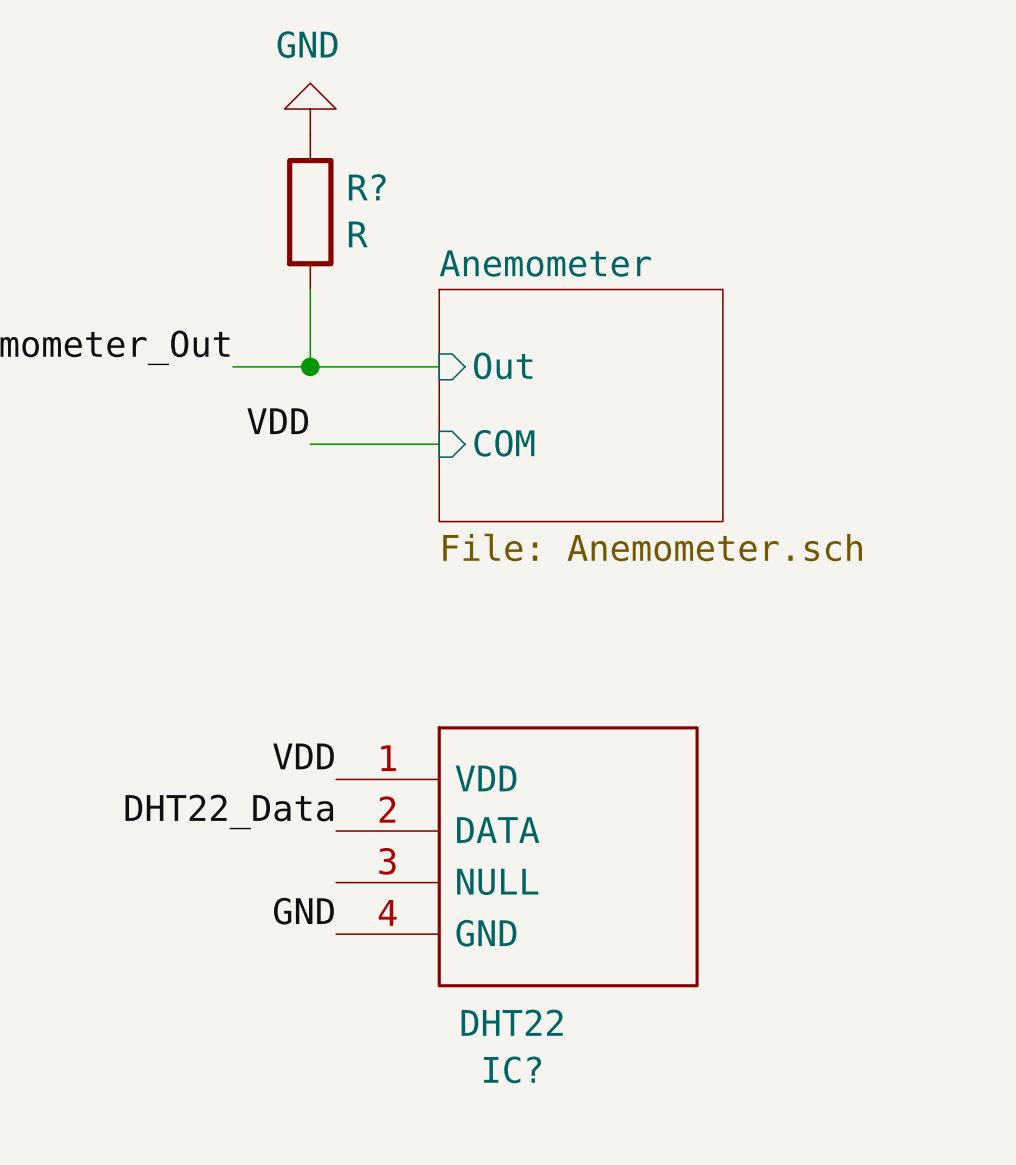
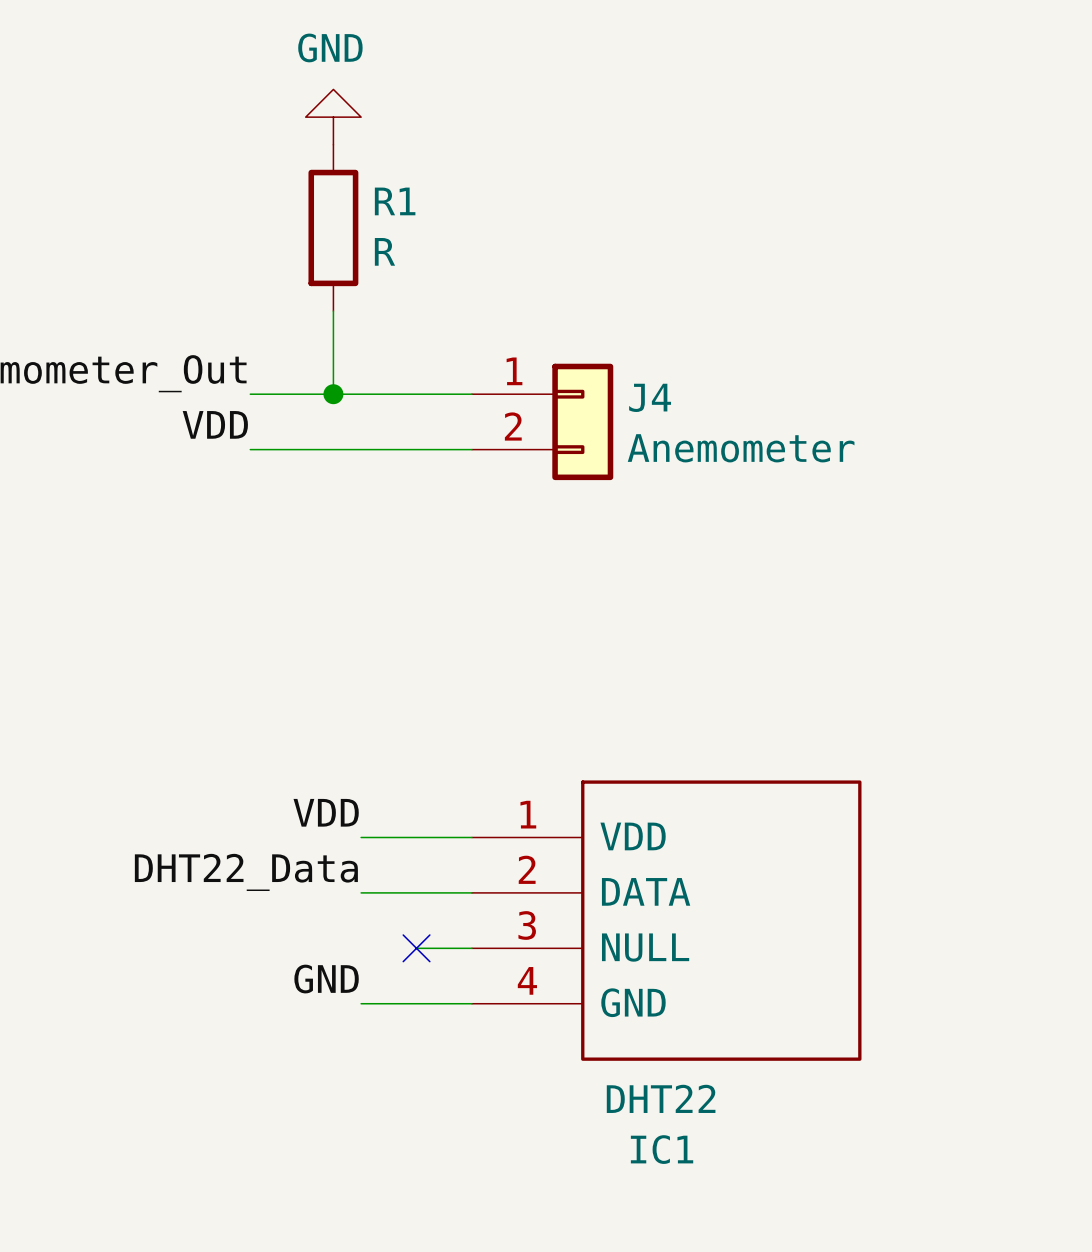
R? name: R? (367, 187) -> R1 (395, 201)
sheet pin: Out (503, 365) -> none
J4: none -> Anemometer (542, 421)
sheet Anemometer: File: Anemometer.sch (581, 405) -> none
wire: none -> (250, 449) (471, 449)
label position: VDD (277, 421) -> VDD (215, 424)
sheet pin: COM (504, 443) -> none
wire: (310, 444) (439, 444) -> none
IC?: DHT22 (517, 856) -> none
IC1: none -> DHT22 (666, 920)
no-connect mark: none -> (416, 948)

